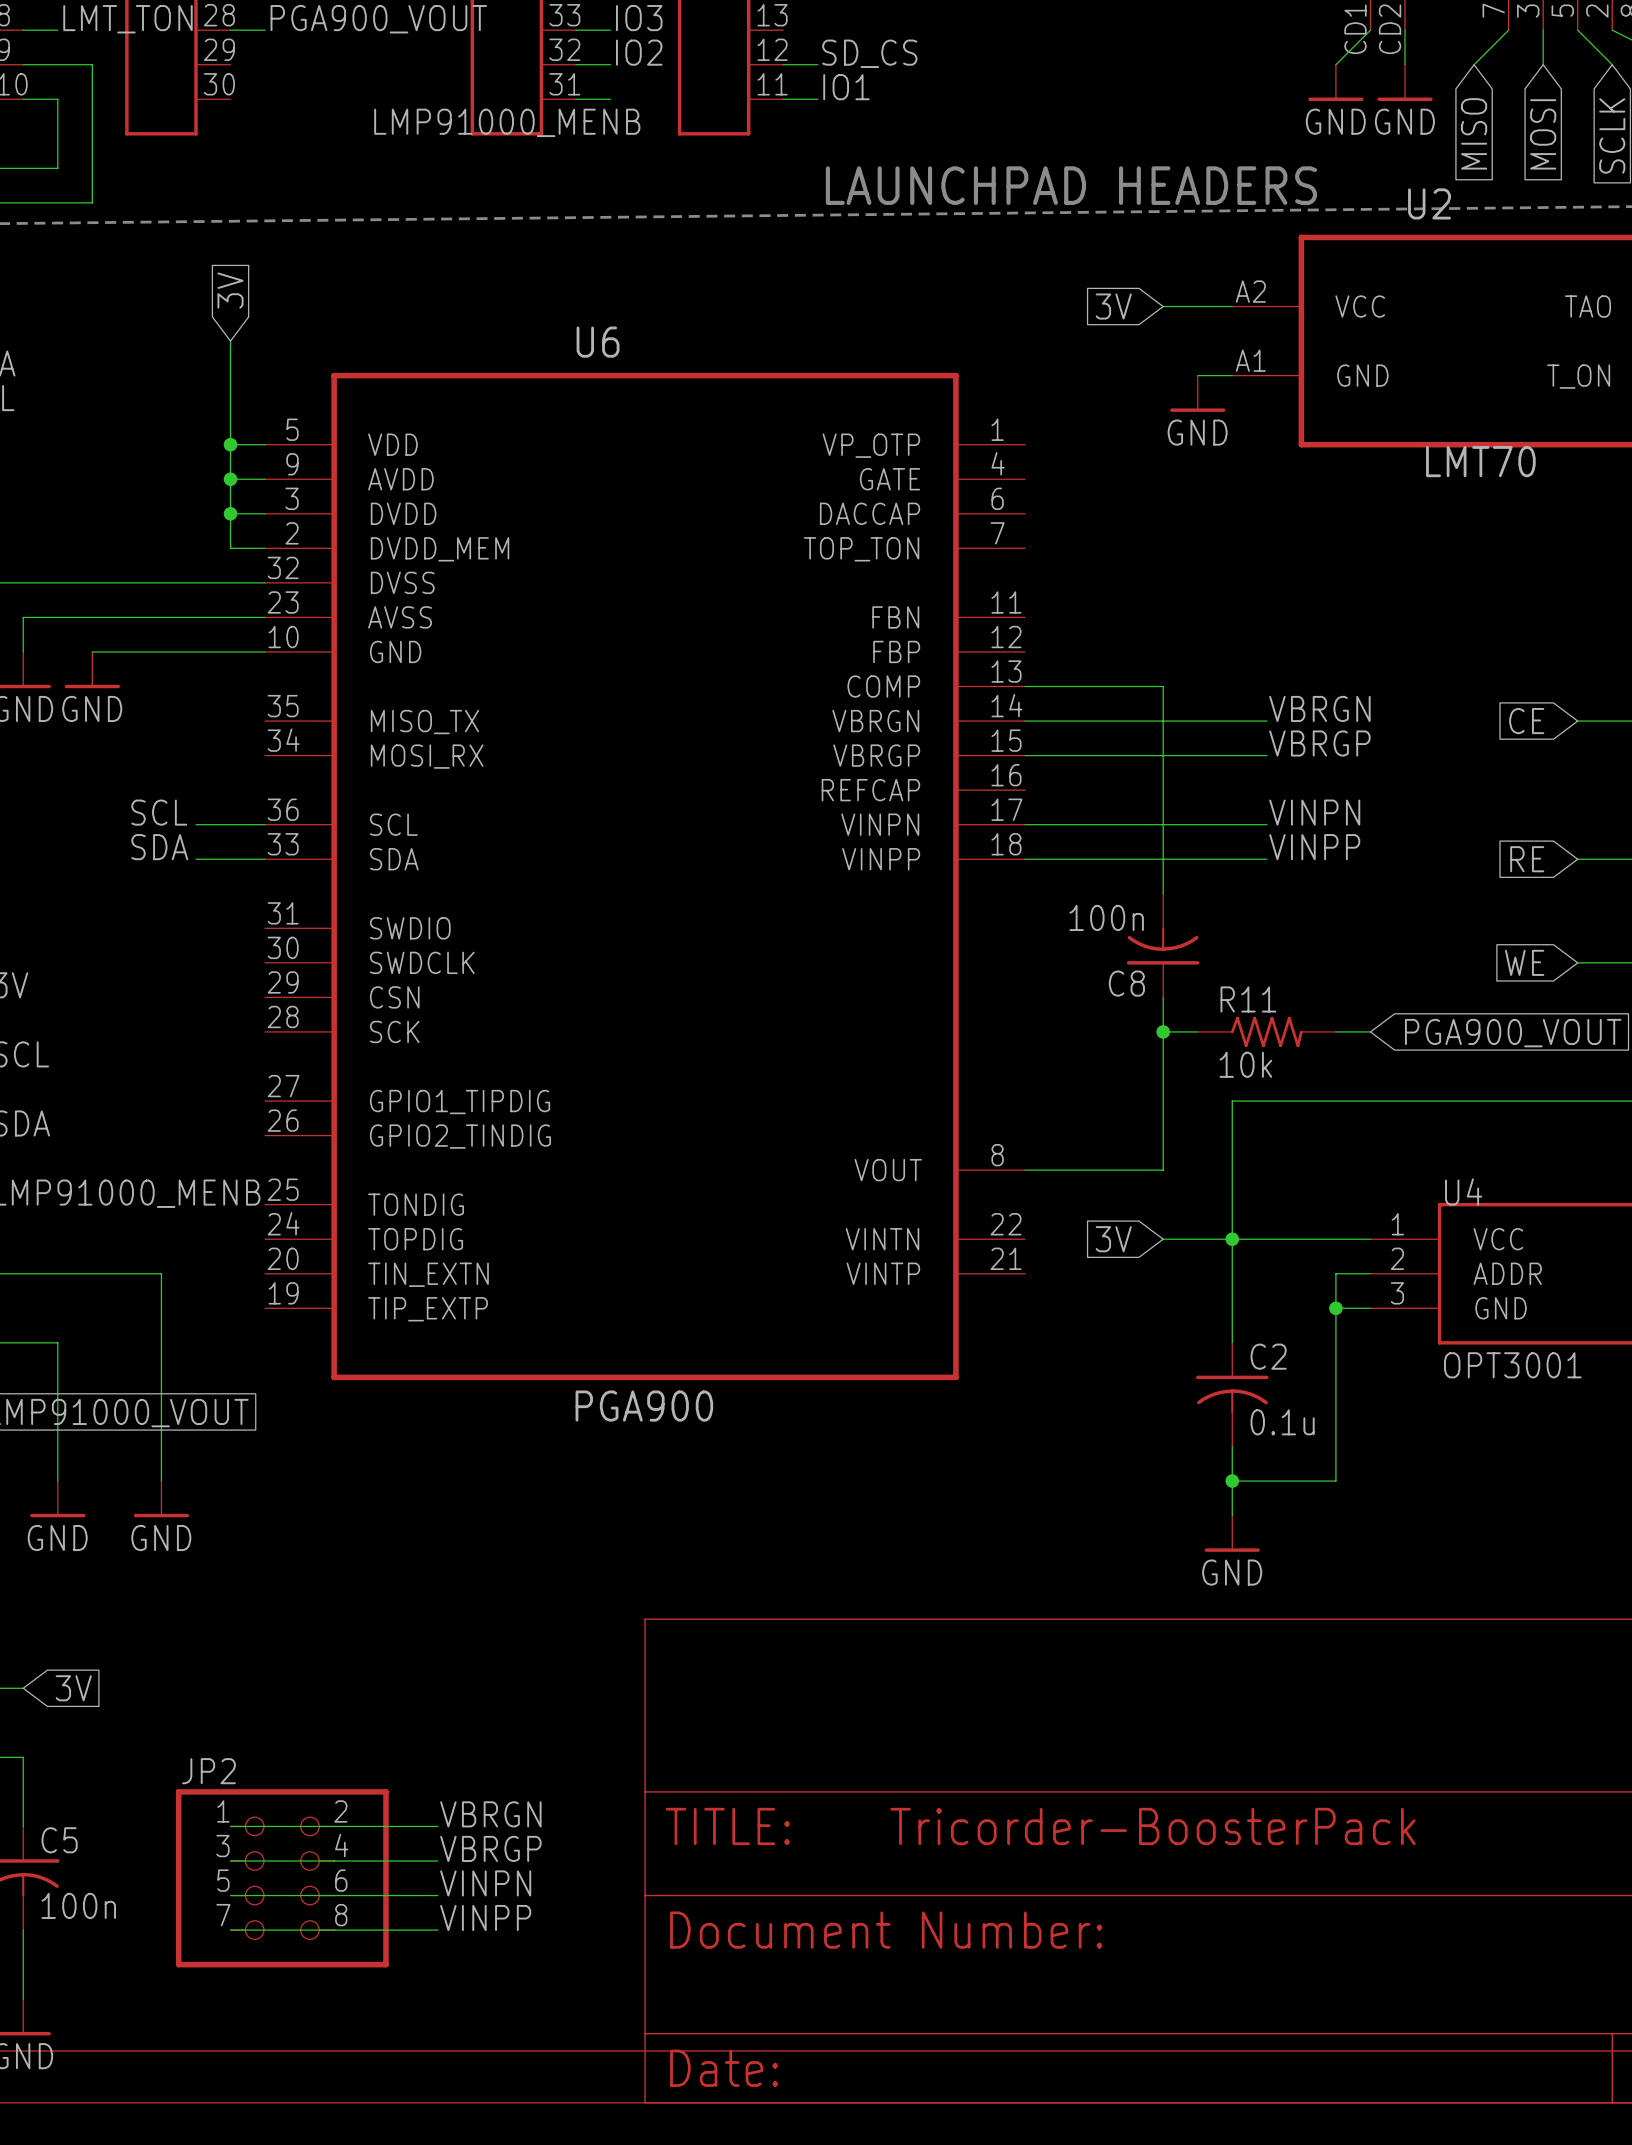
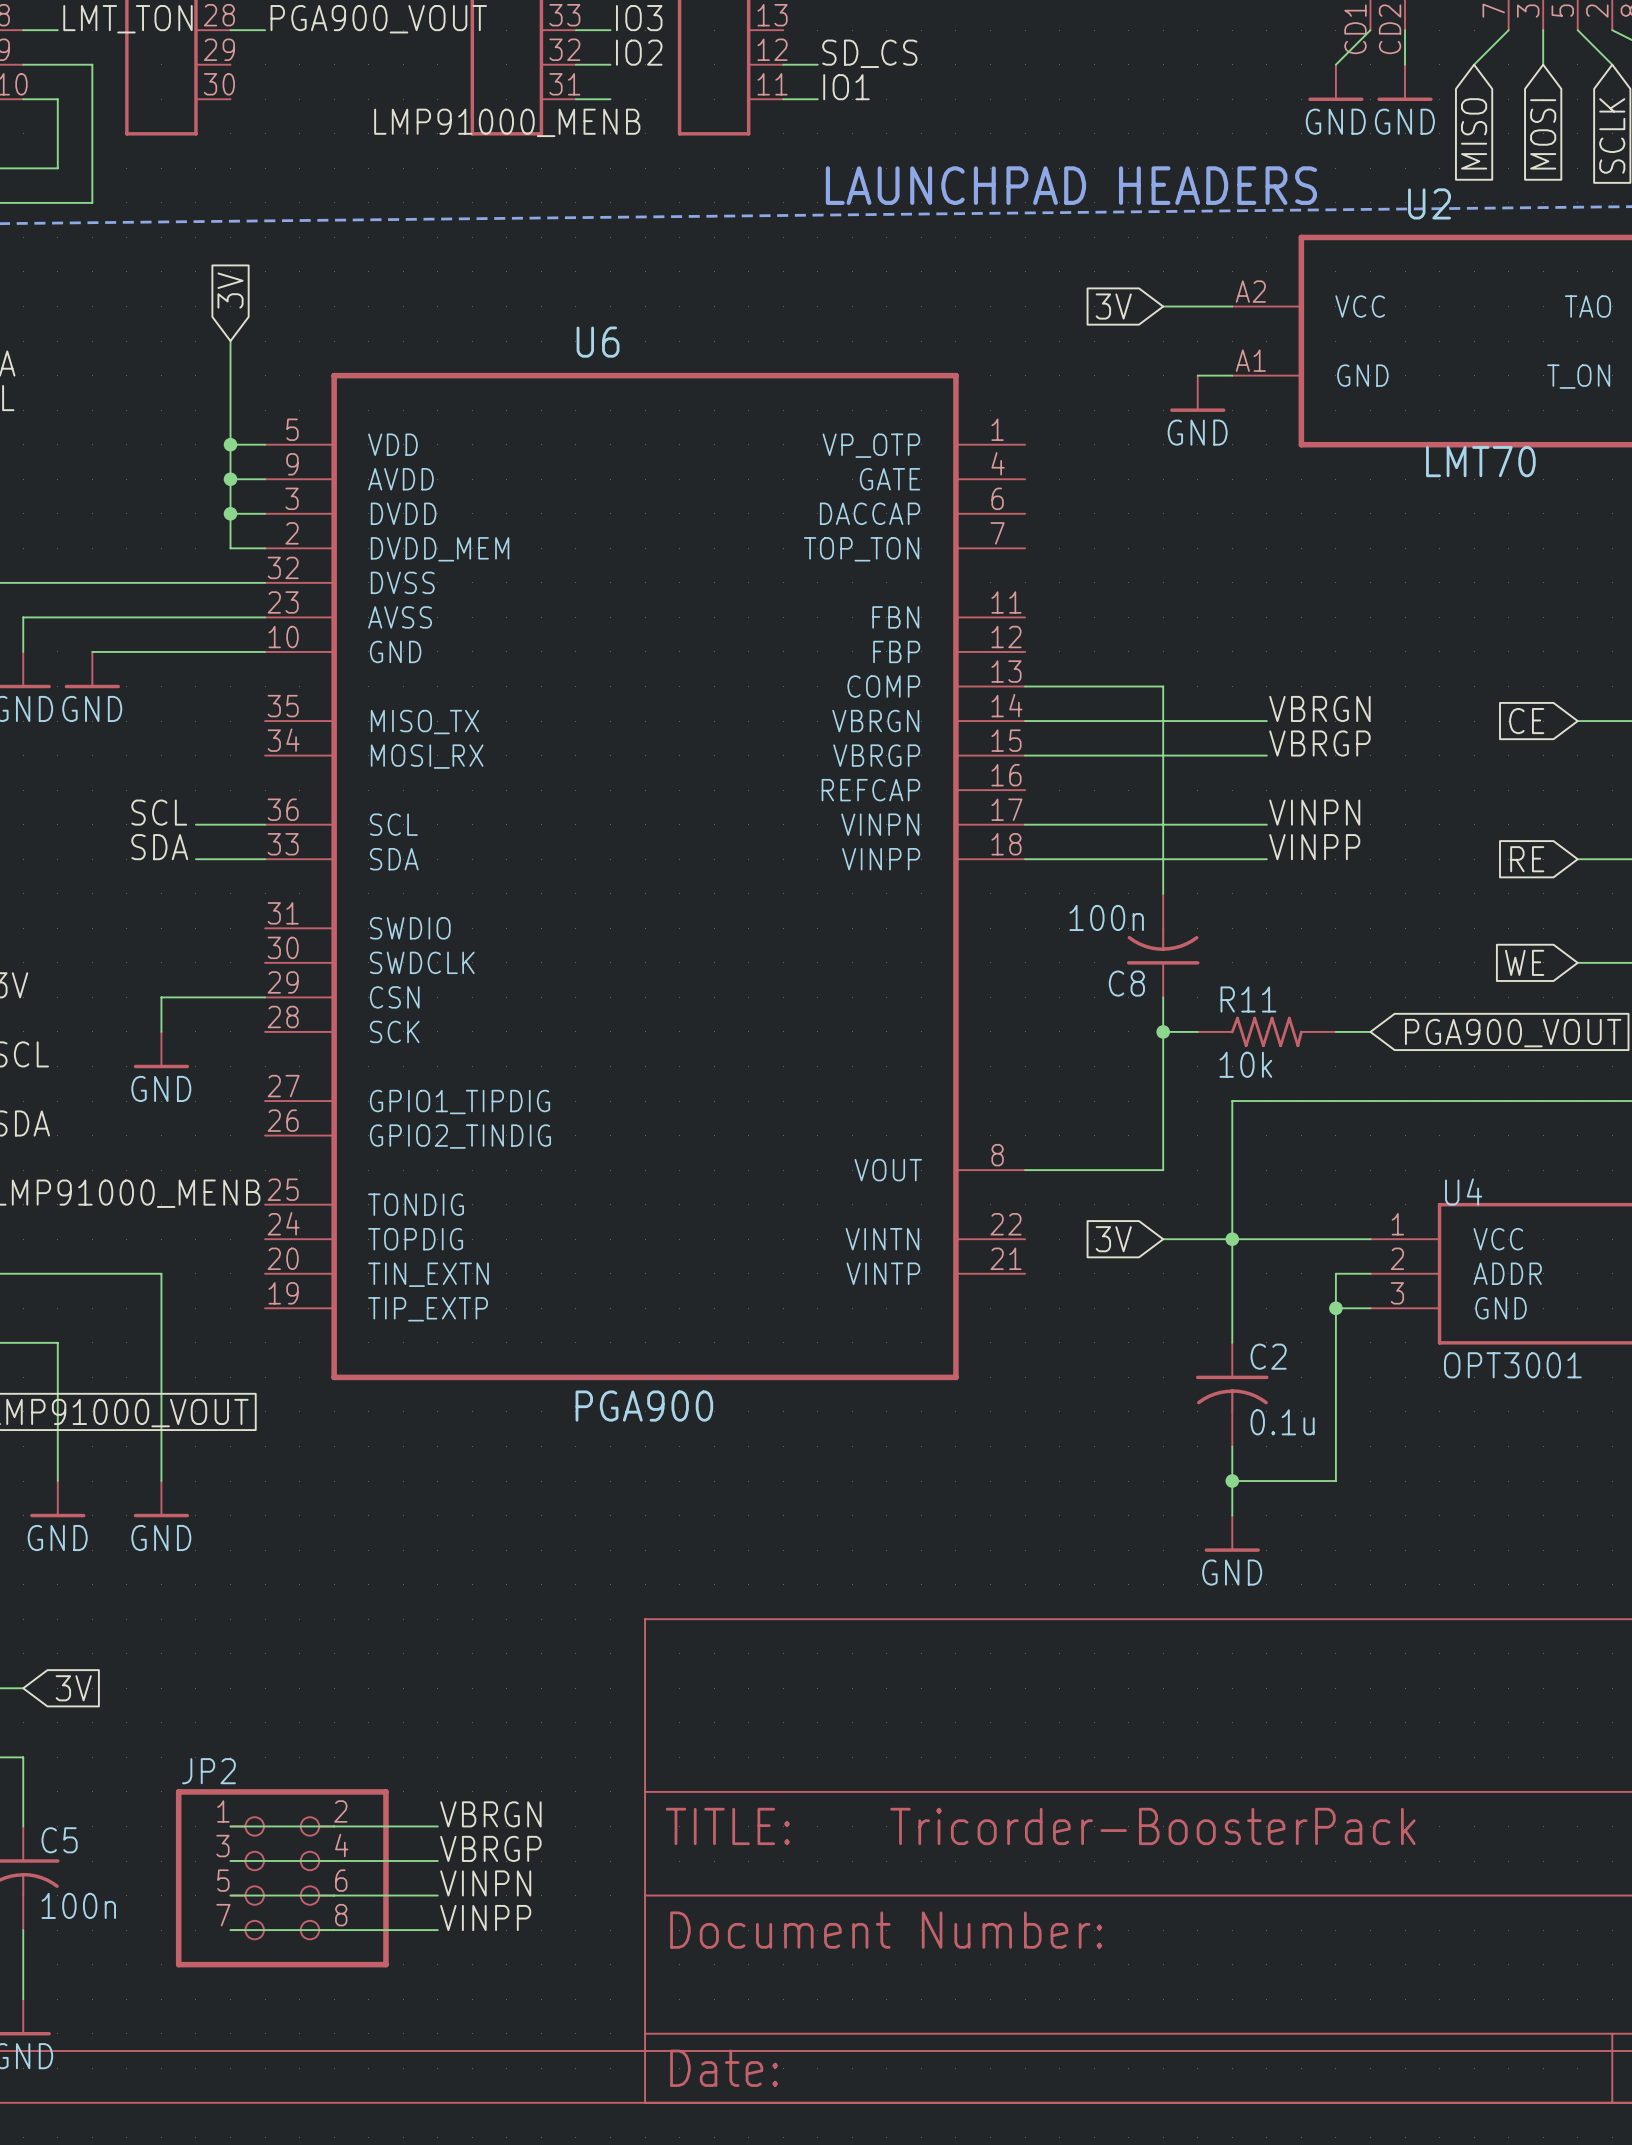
wire: none -> (265, 997) (161, 997) (161, 1031)
power symbol: none -> GND (161, 1050)

